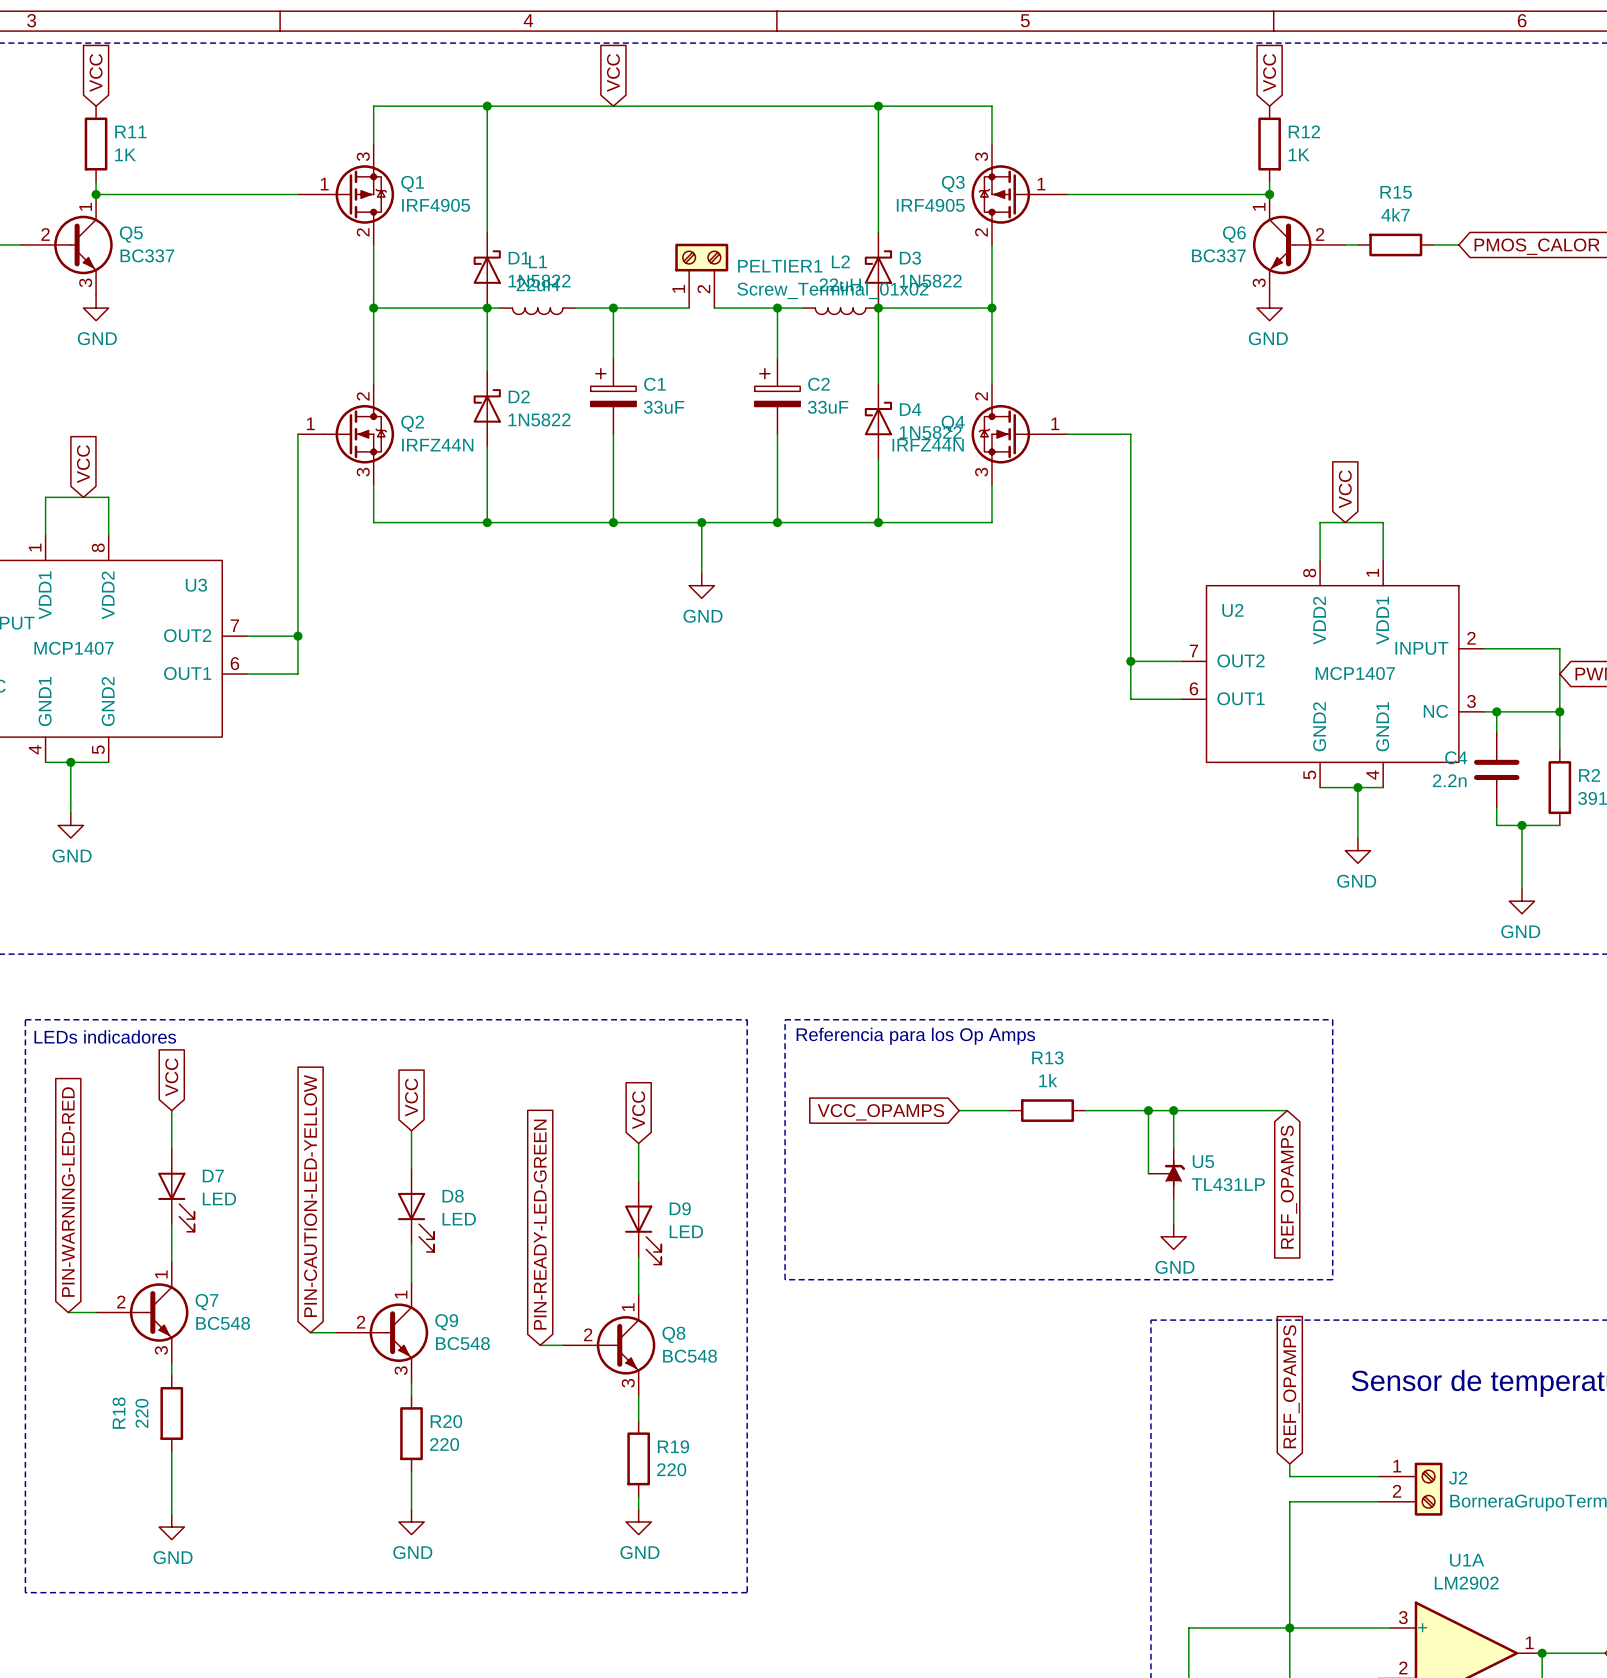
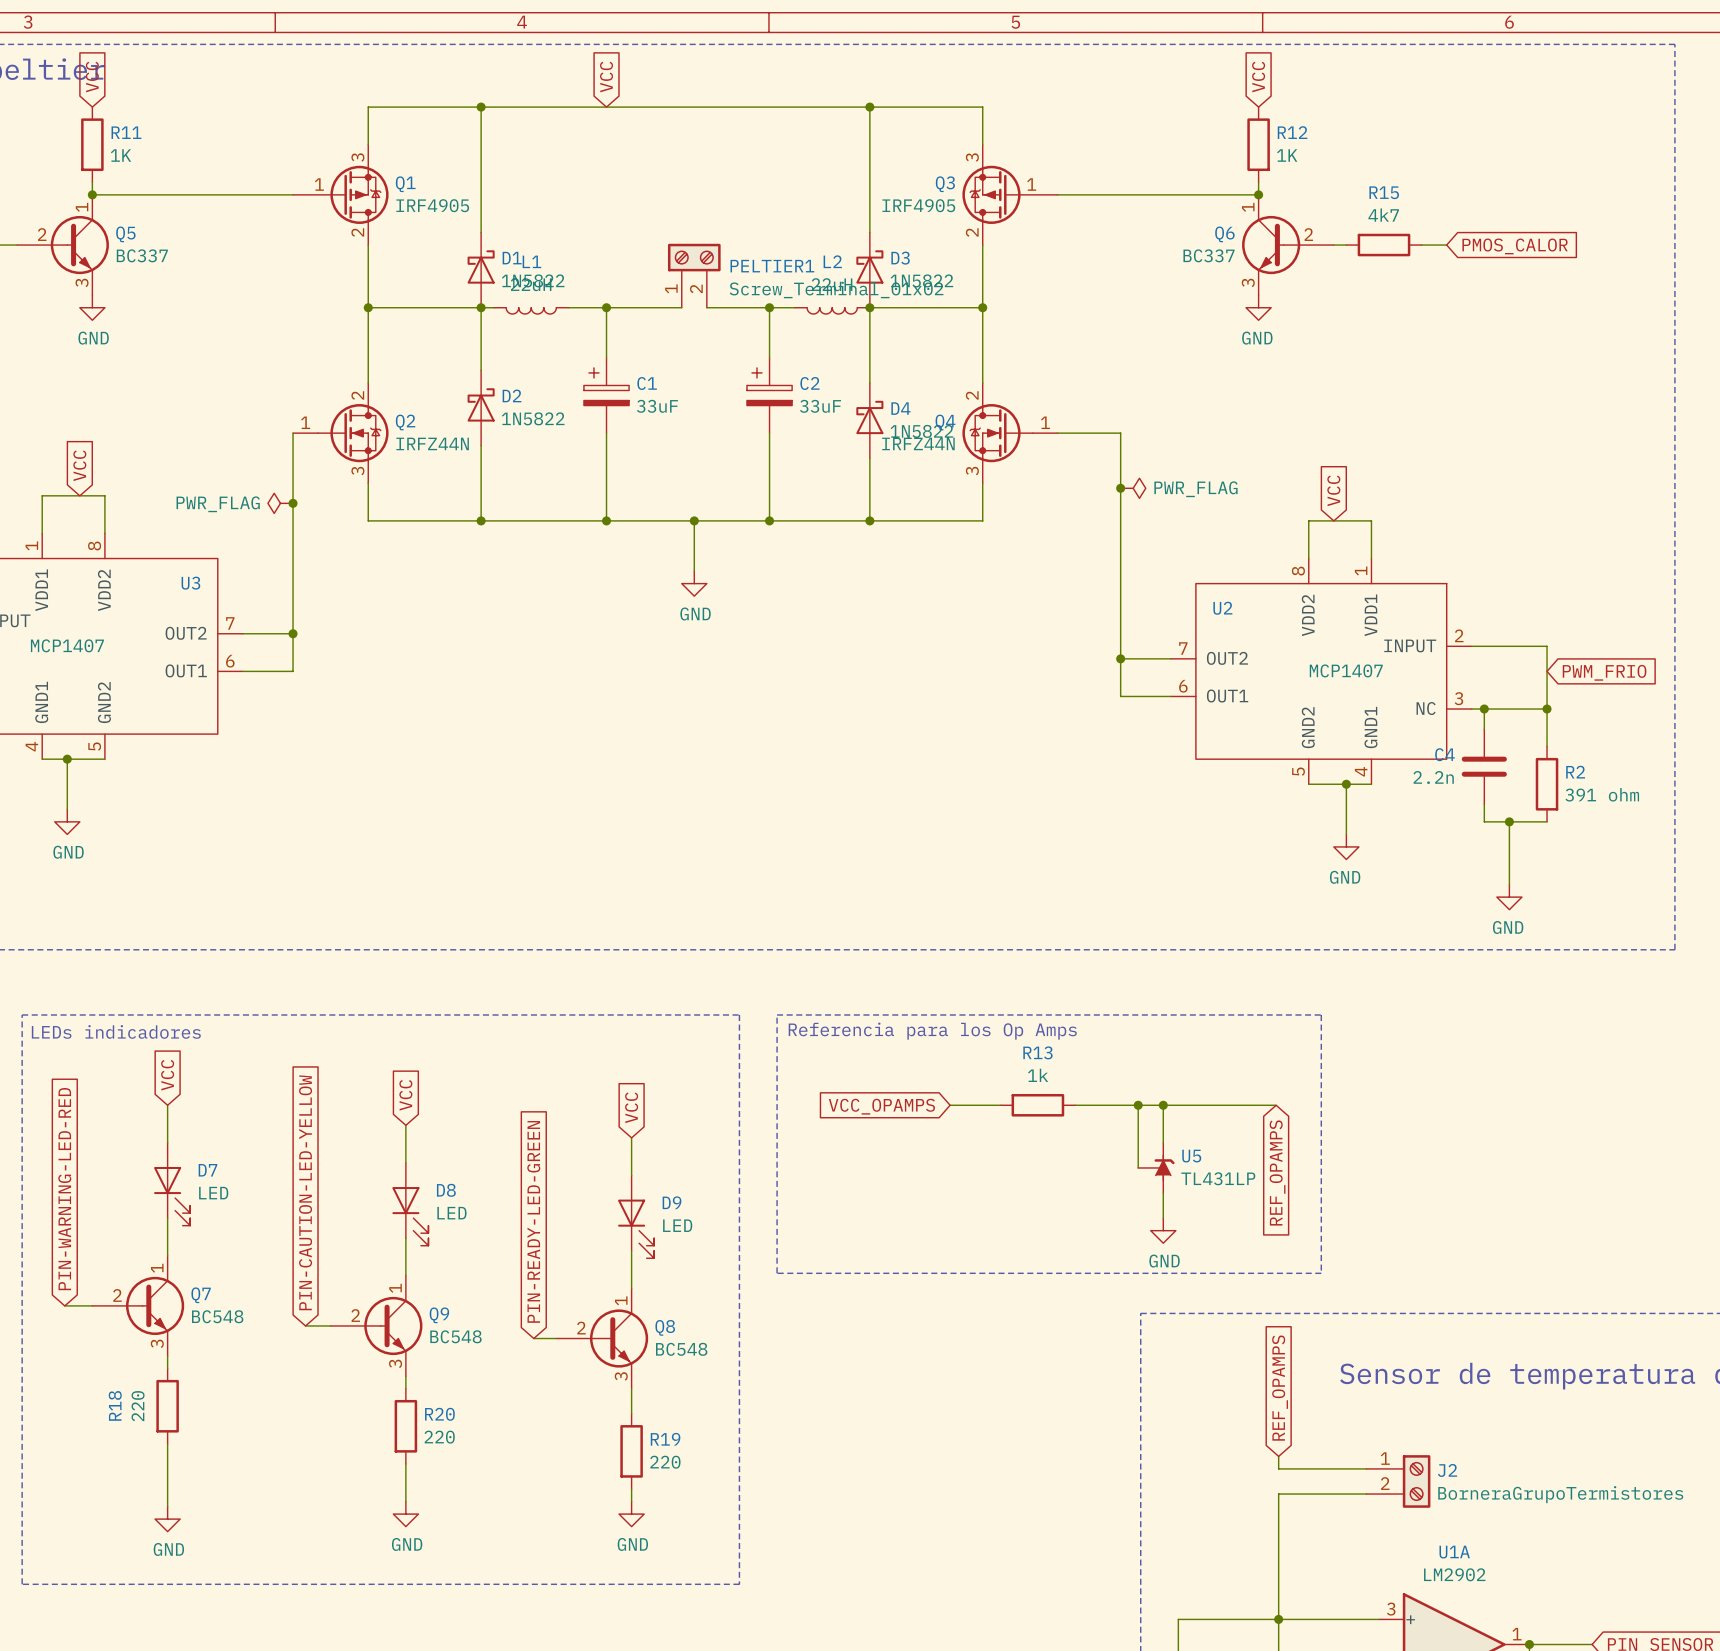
junction: none -> (1120, 488)
power symbol: none -> PWR_FLAG (1133, 488)
power symbol: none -> PWR_FLAG (280, 503)
junction: none -> (293, 503)

